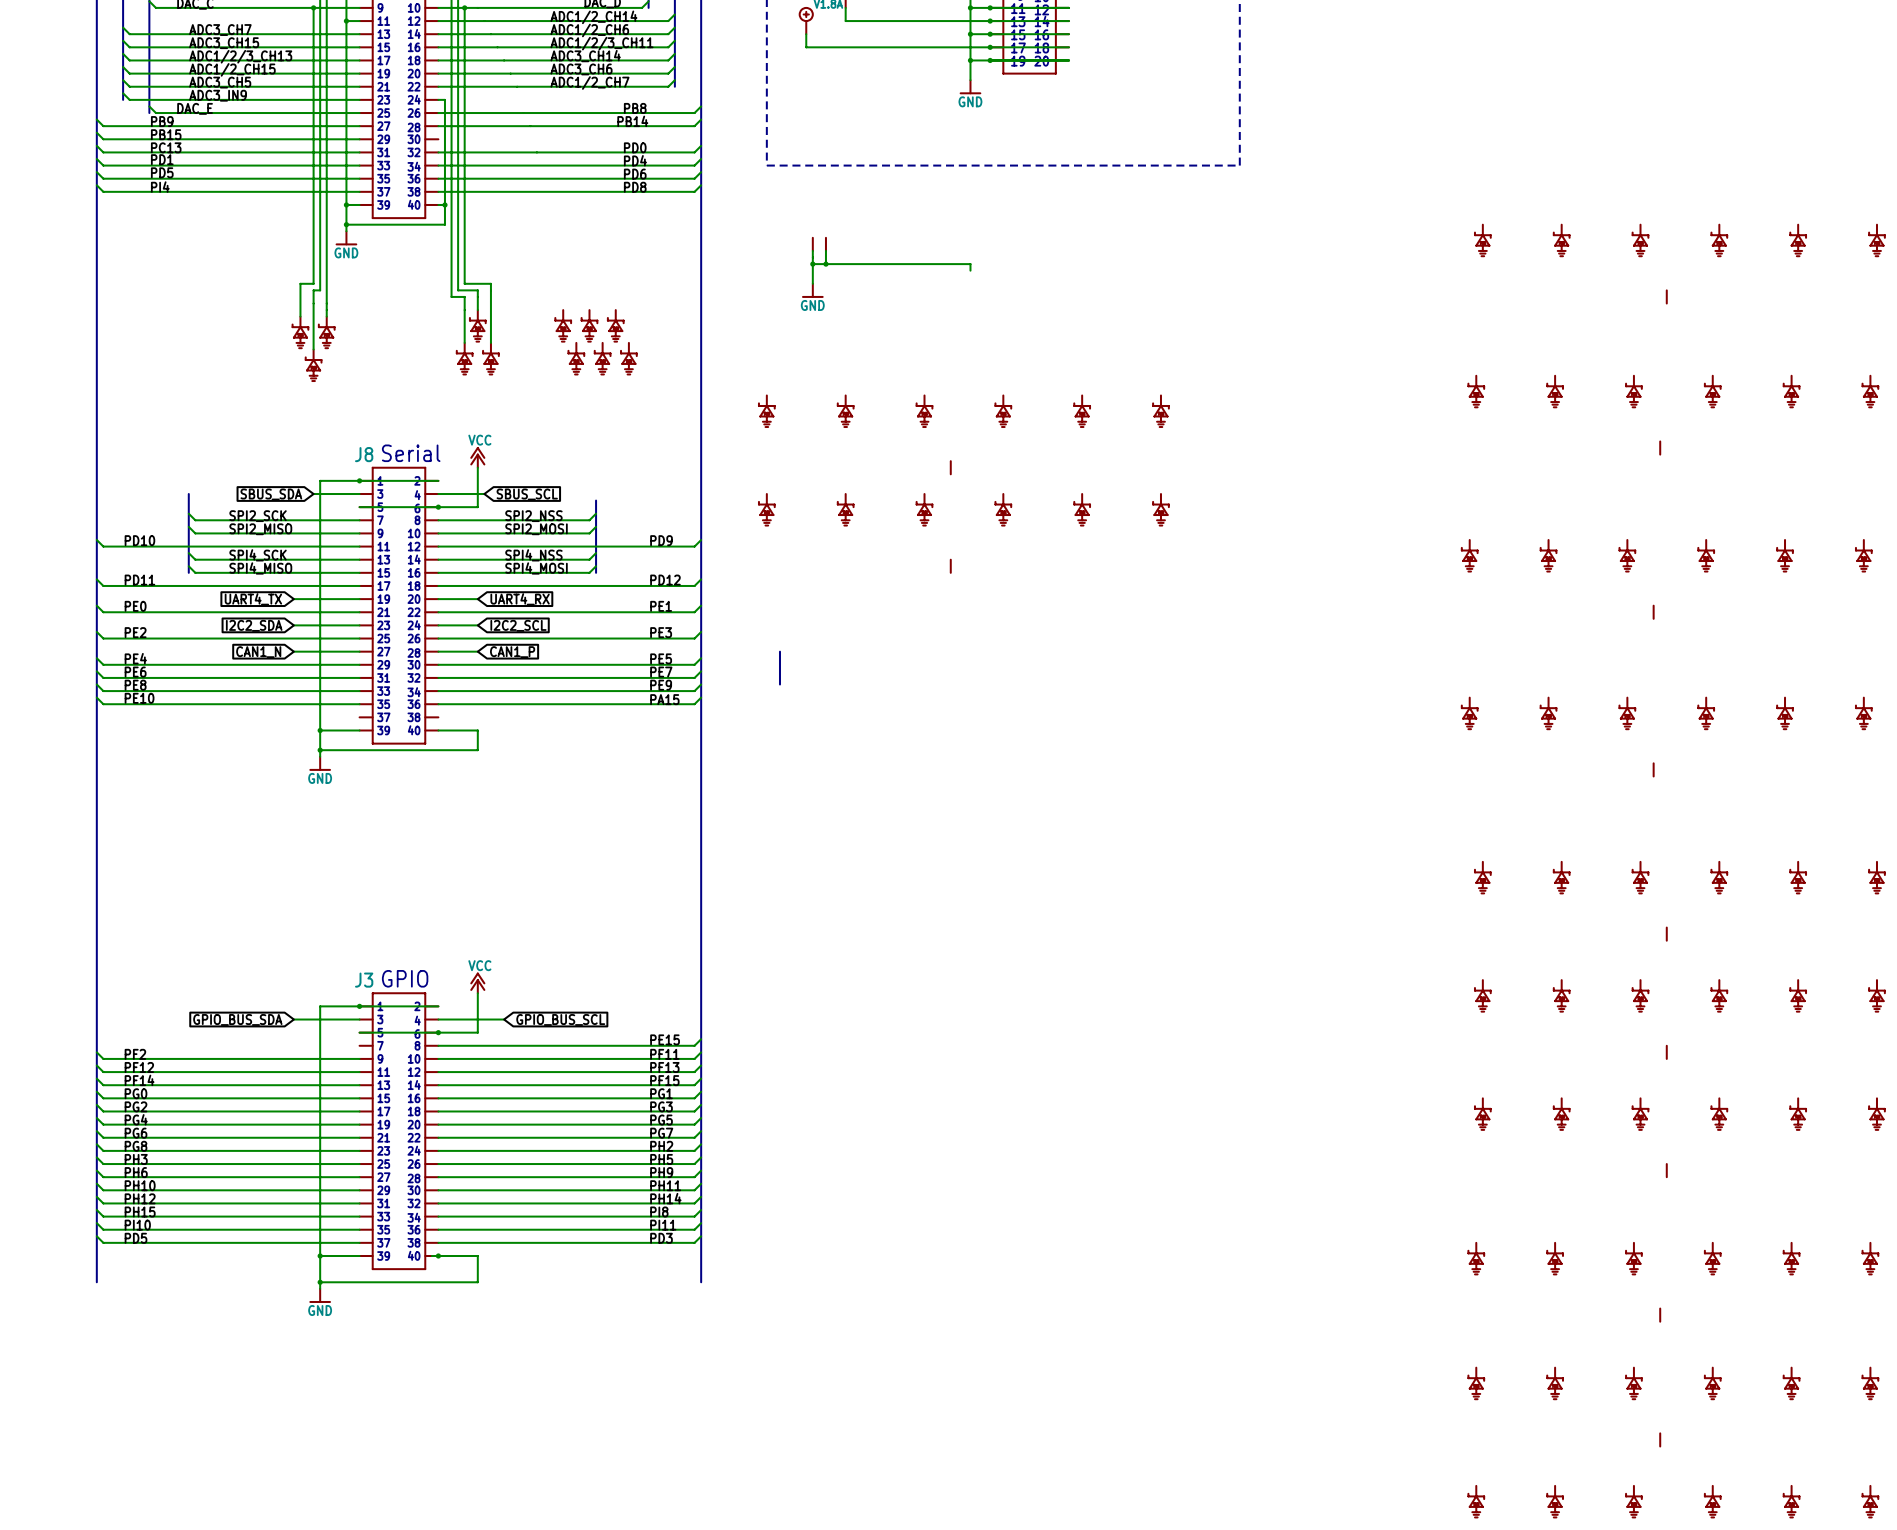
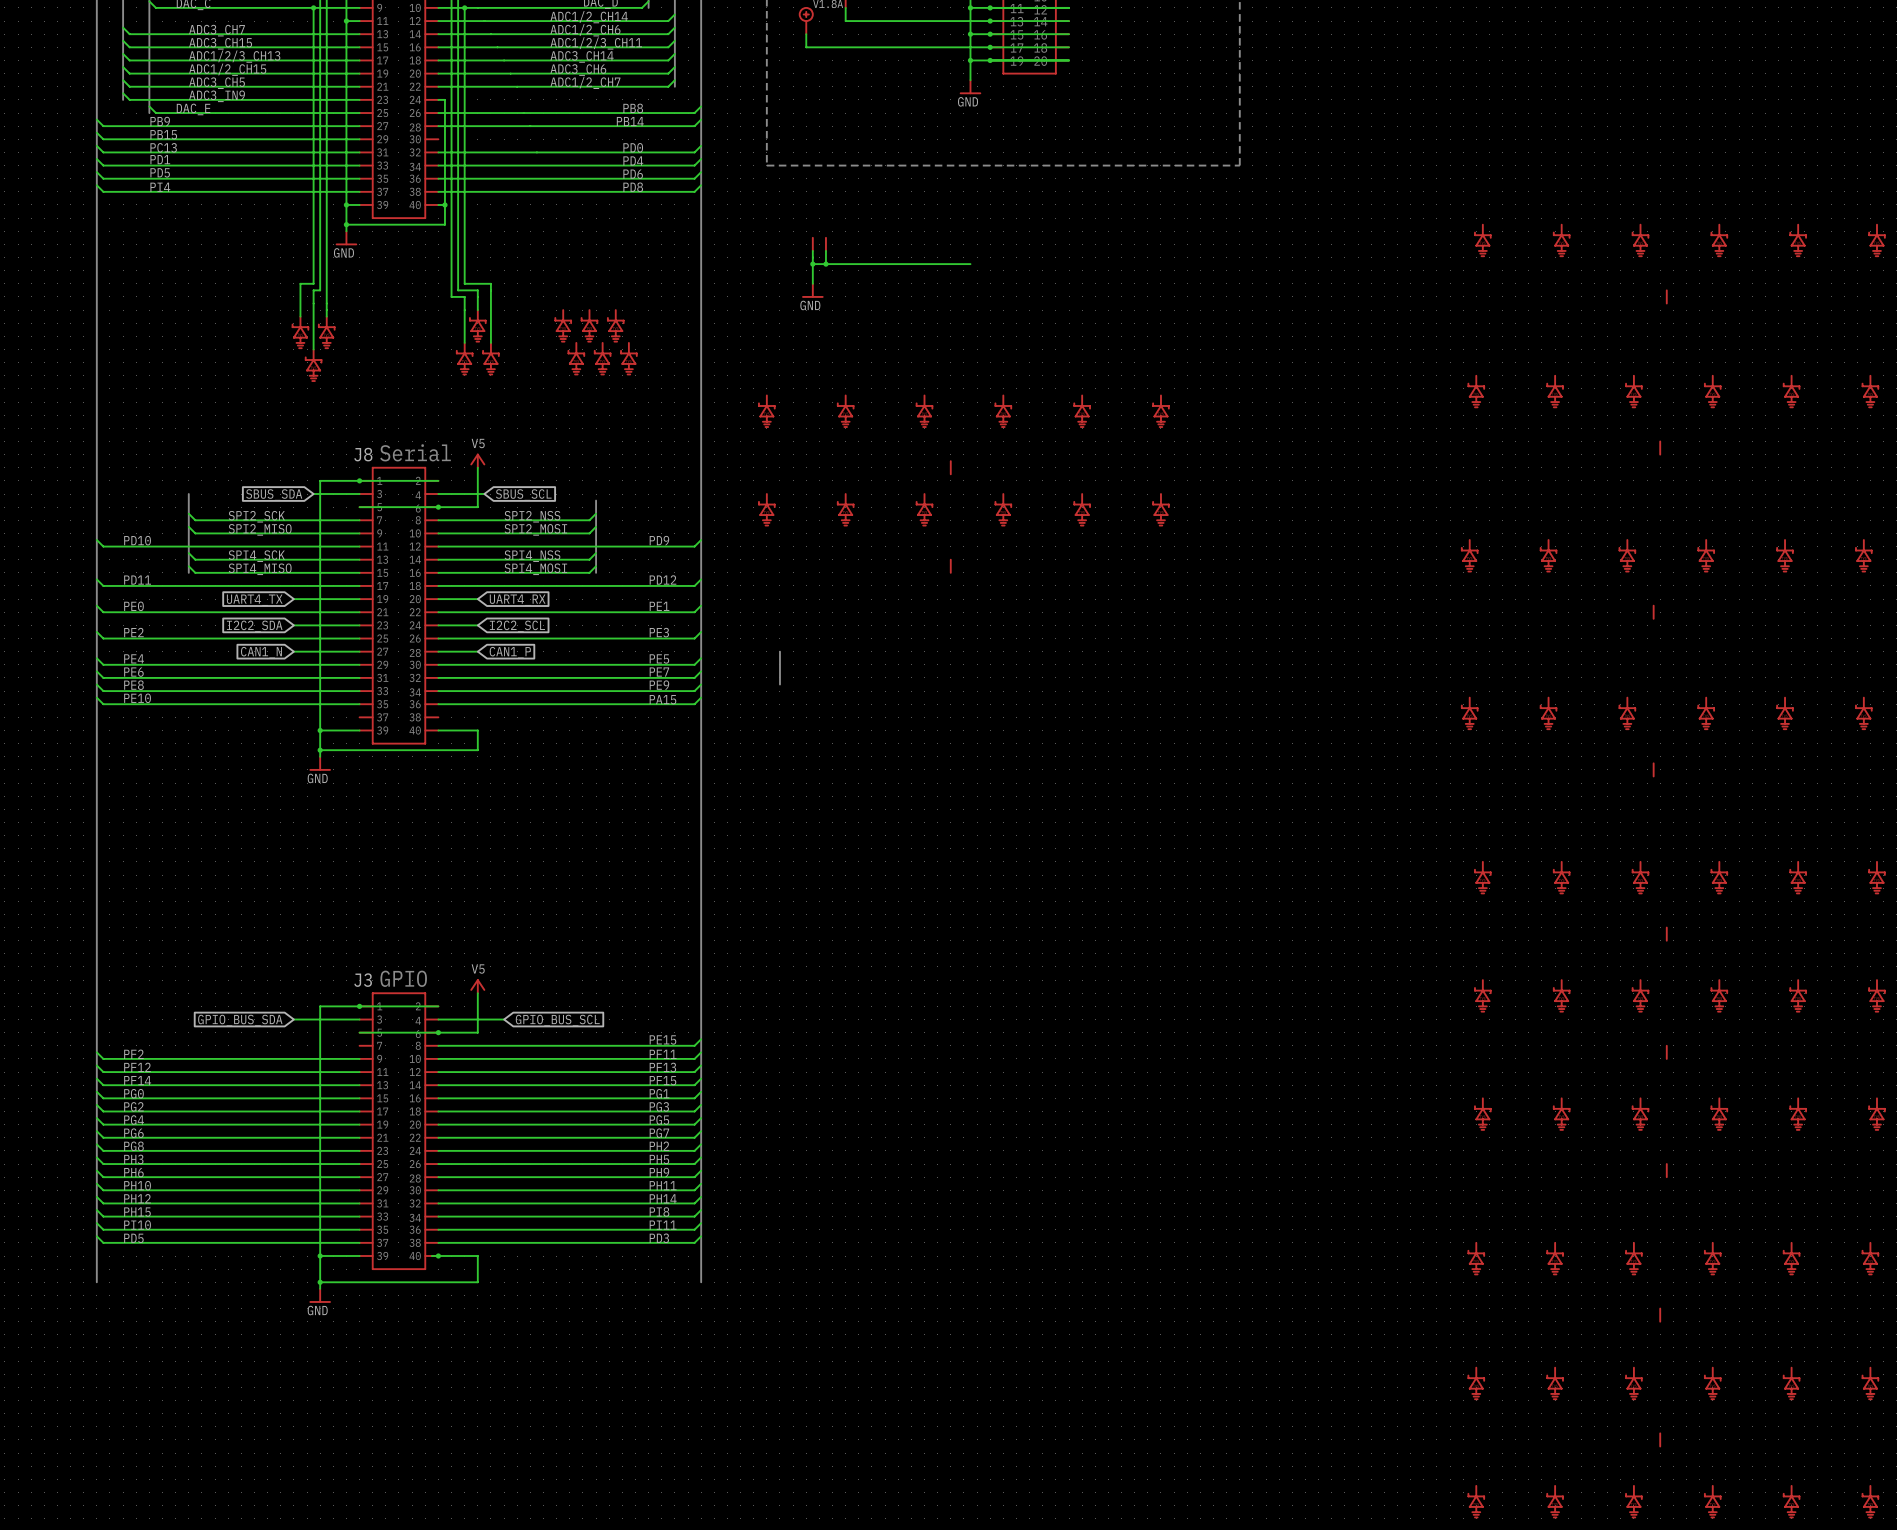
wire: (970, 264) (970, 270) -> none
power symbol: VCC (477, 457) -> V5 (477, 460)
power symbol: VCC (477, 983) -> V5 (477, 986)

